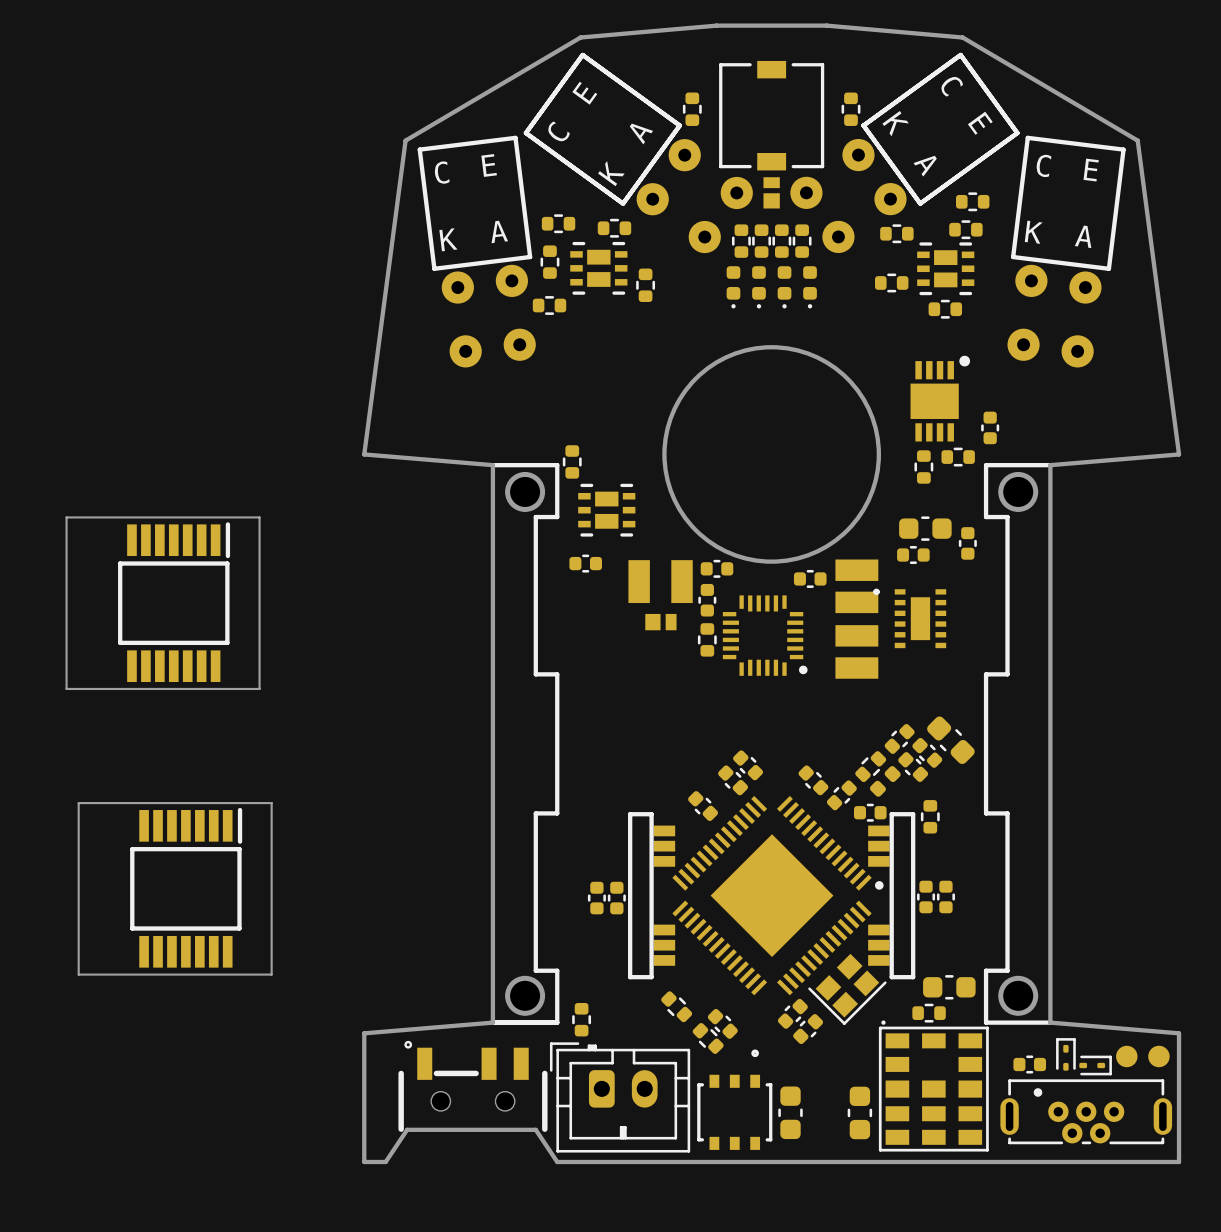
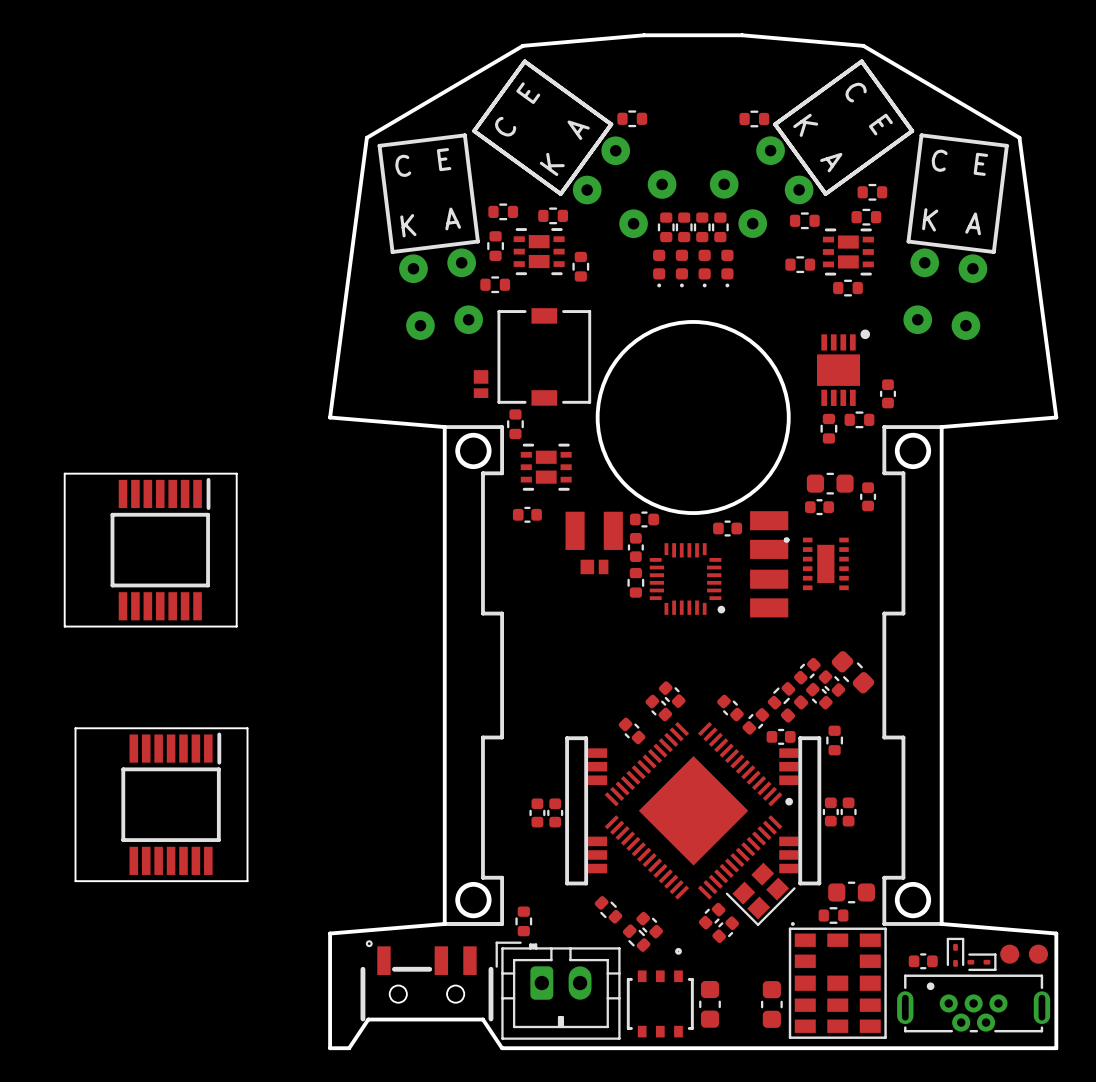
part rotation: 0° (692, 109) -> 90° clockwise (632, 118)
part rotation: 0° (850, 109) -> 90° clockwise (754, 118)
part position: (771, 115) -> (544, 356)
part rotation: 0° (771, 192) -> 180° (481, 384)
part position: (771, 192) -> (481, 384)

